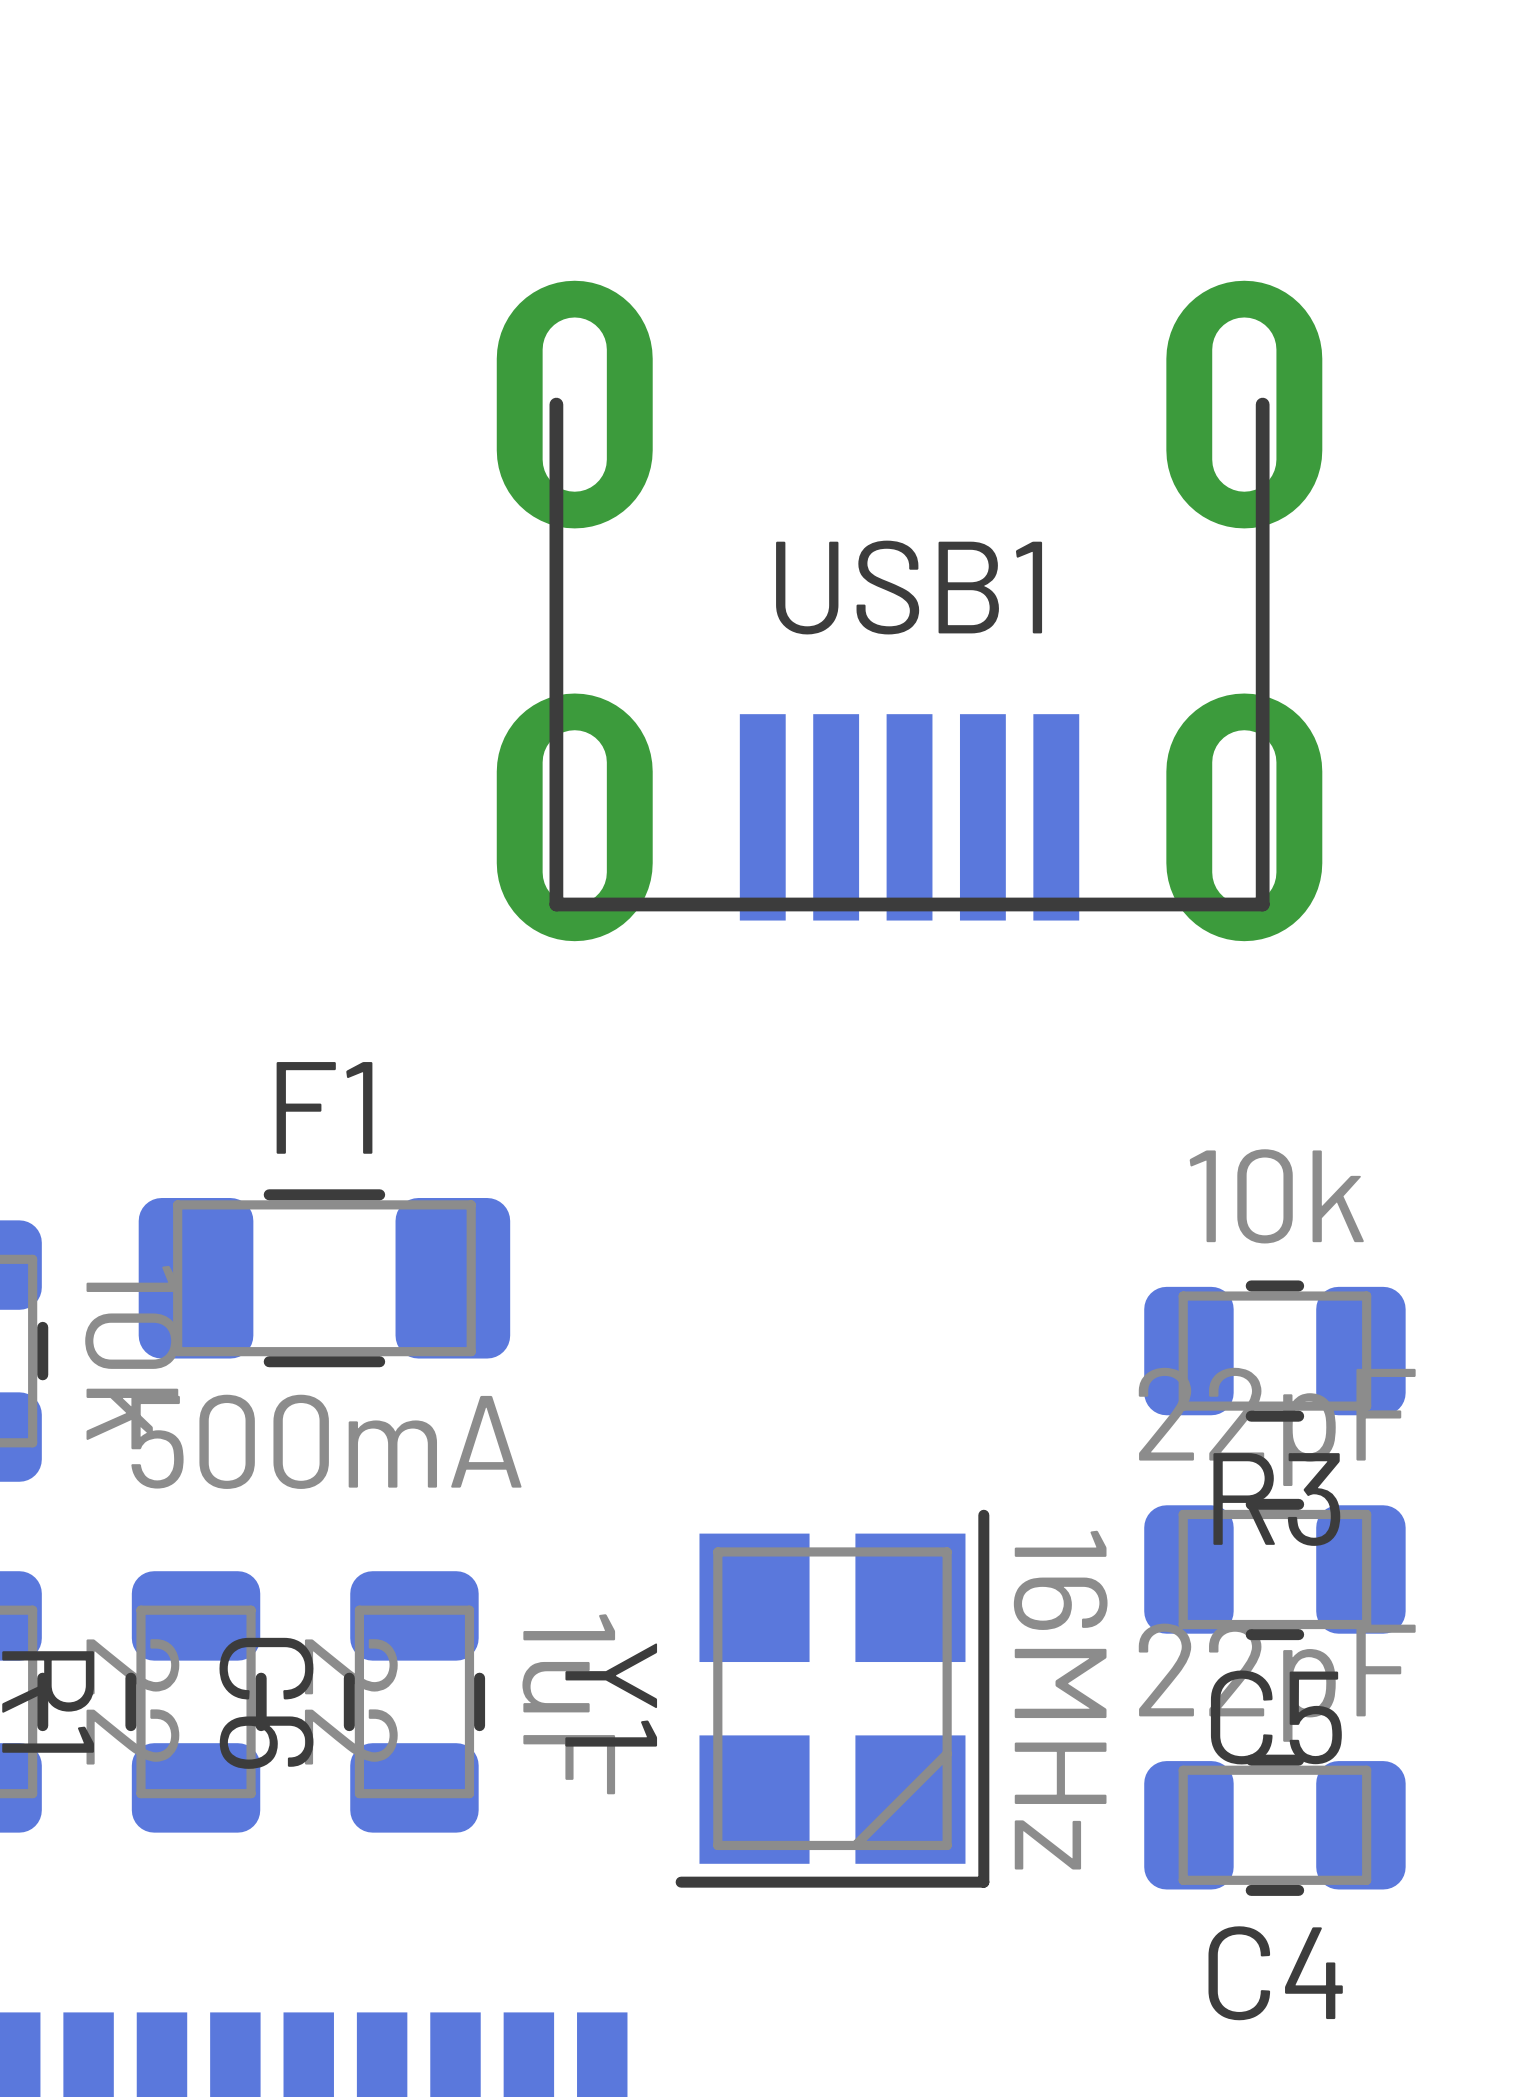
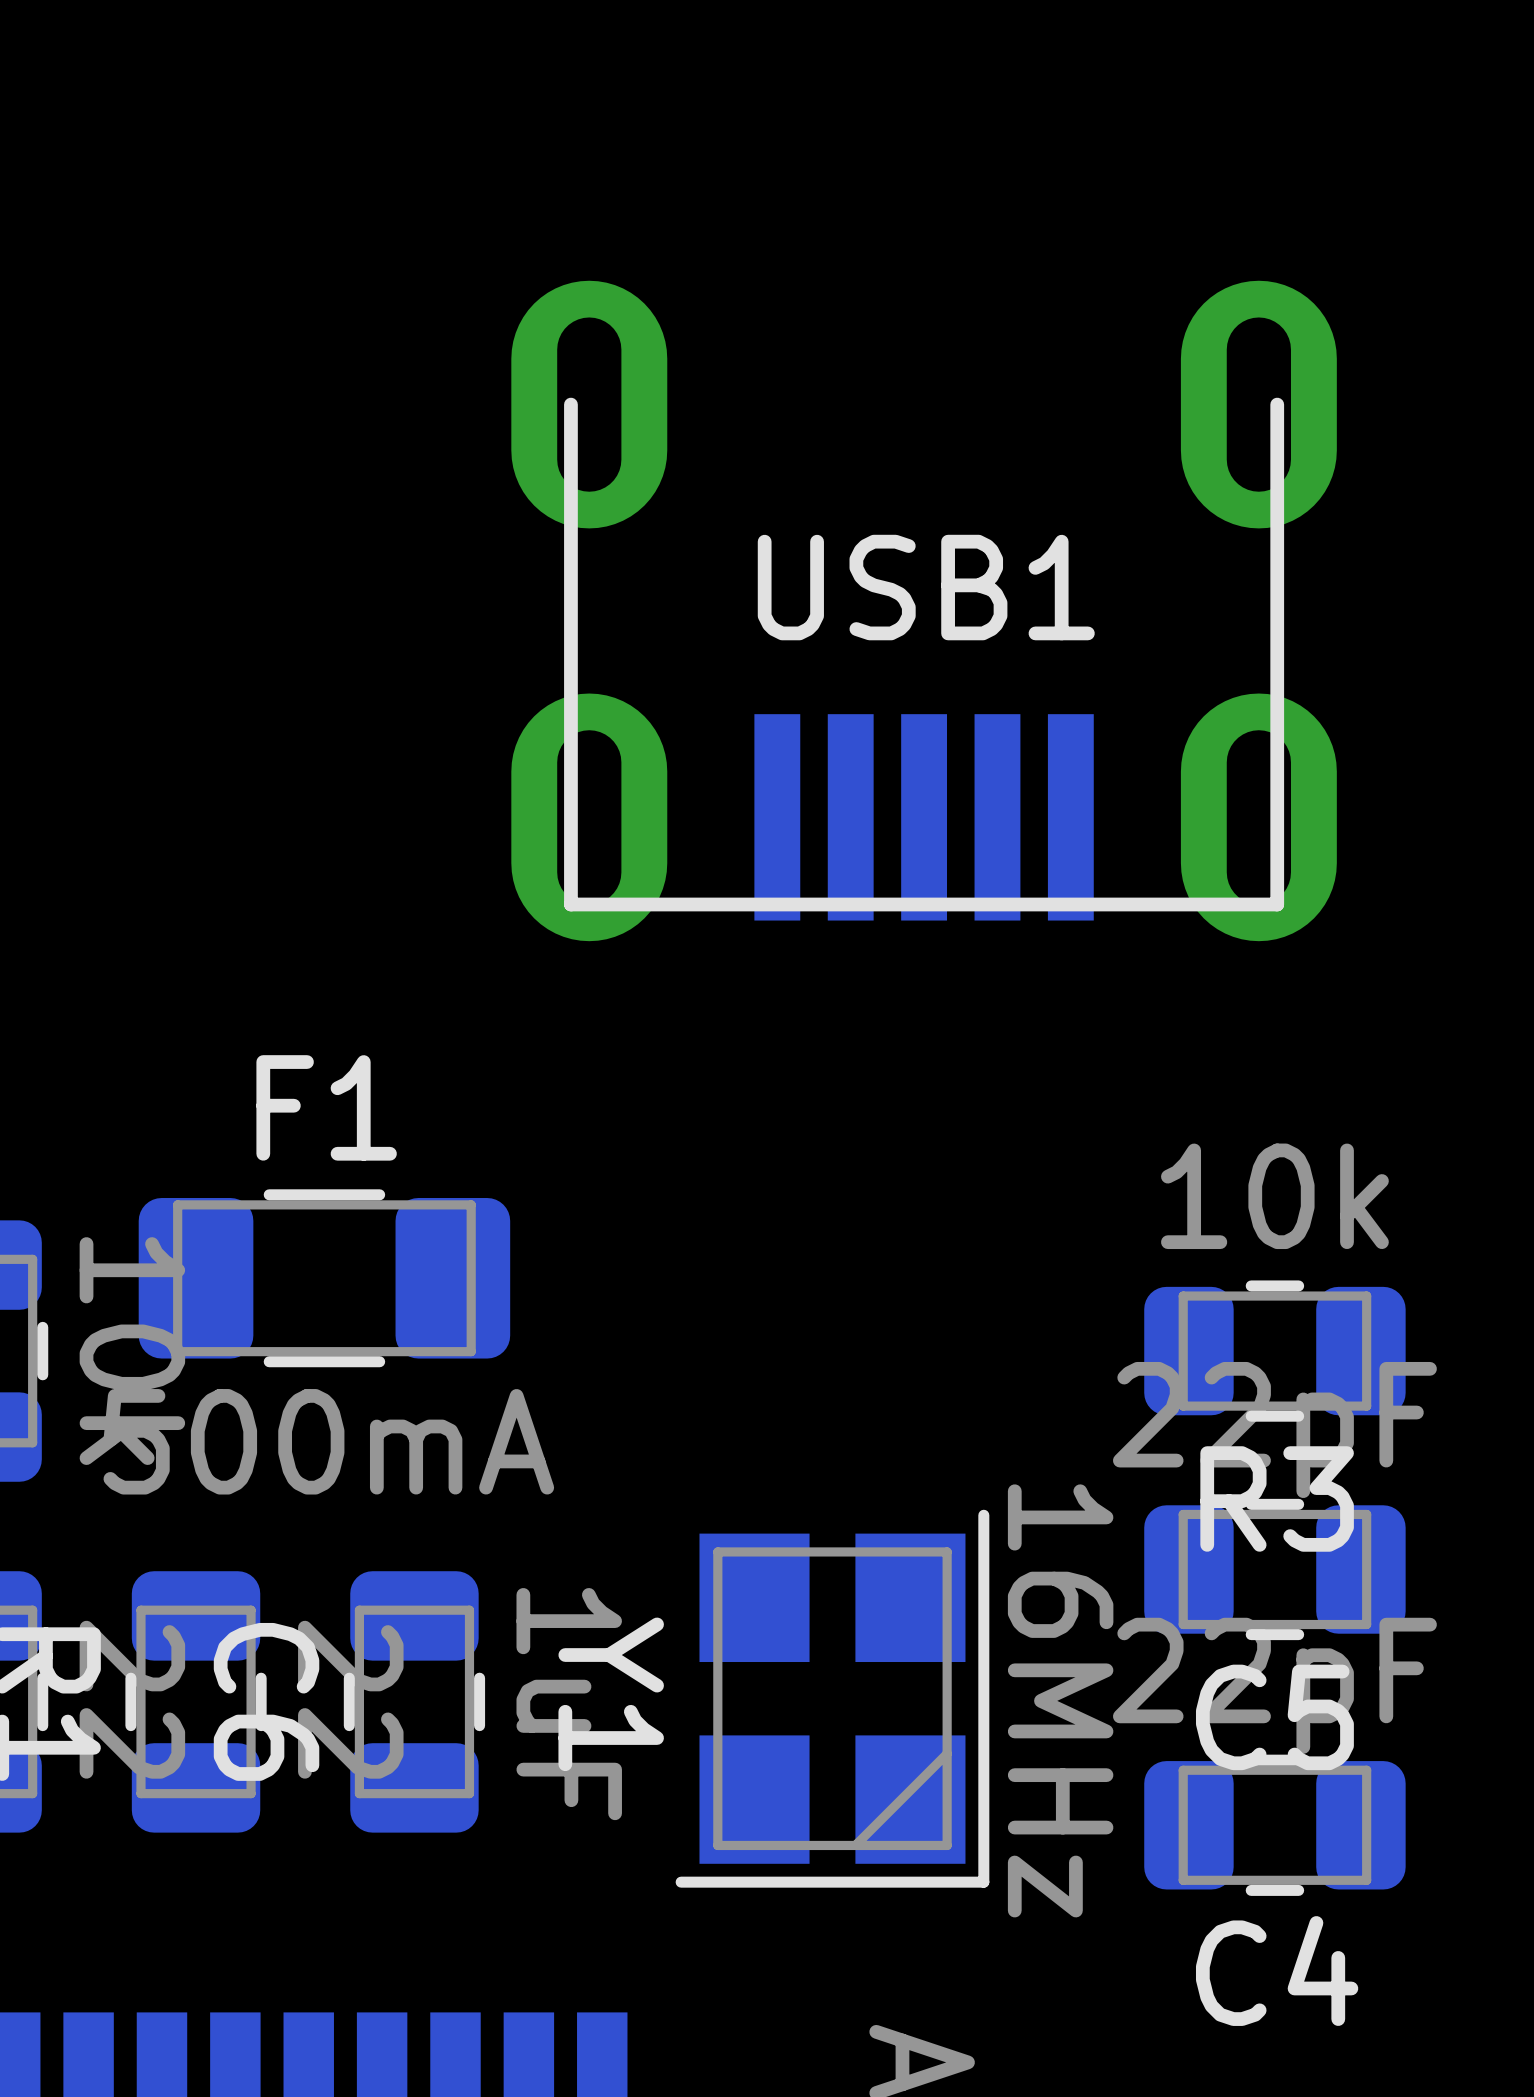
USB1 position: (909, 610) -> (924, 610)

